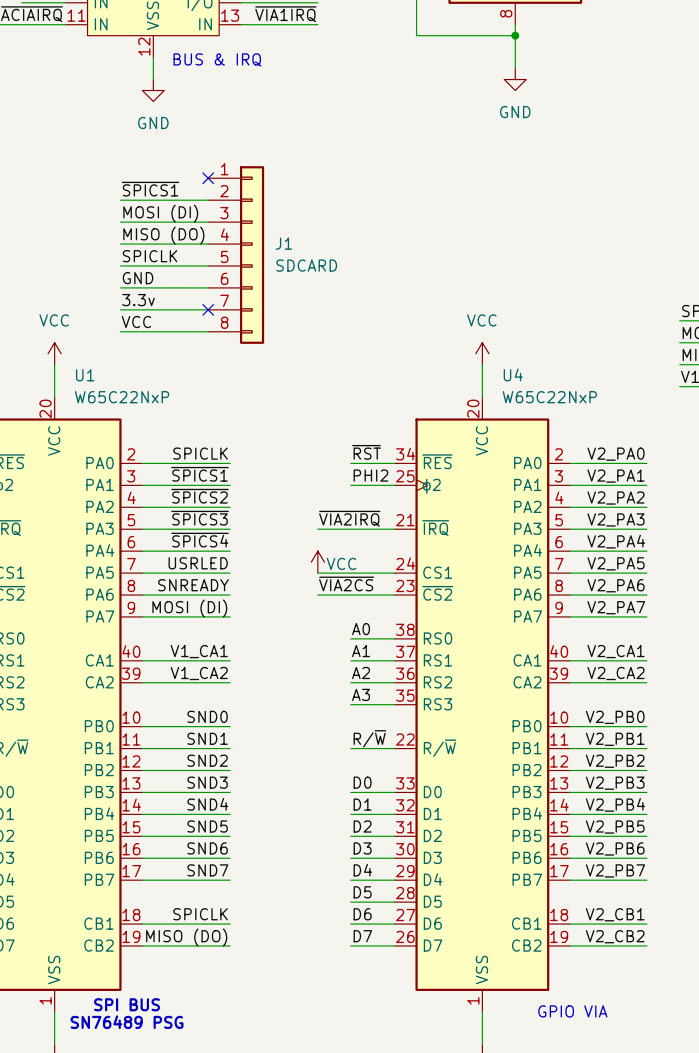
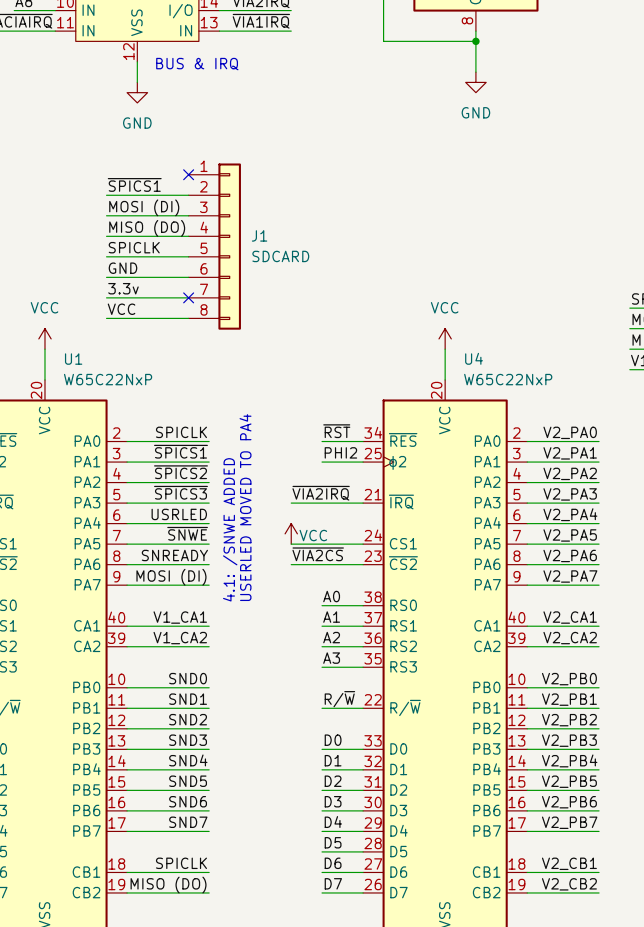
text: none -> USERLED MOVED TO PA4 (245, 507)
label: ~{SPICS4} (200, 540) -> USRLED (179, 514)
text: none -> 4.1: /SNWE ADDED (230, 529)
label: USRLED (198, 563) -> ~{SNWE} (187, 533)

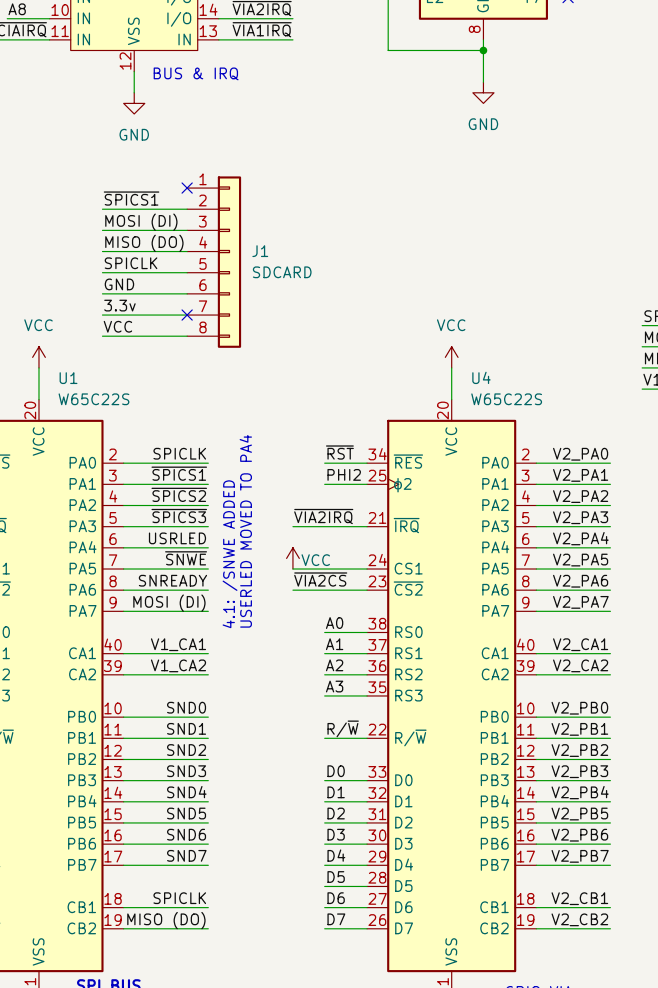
U1 value: W65C22NxP (108, 379) -> W65C22S (93, 399)
U4 value: W65C22NxP (508, 379) -> W65C22S (506, 399)

